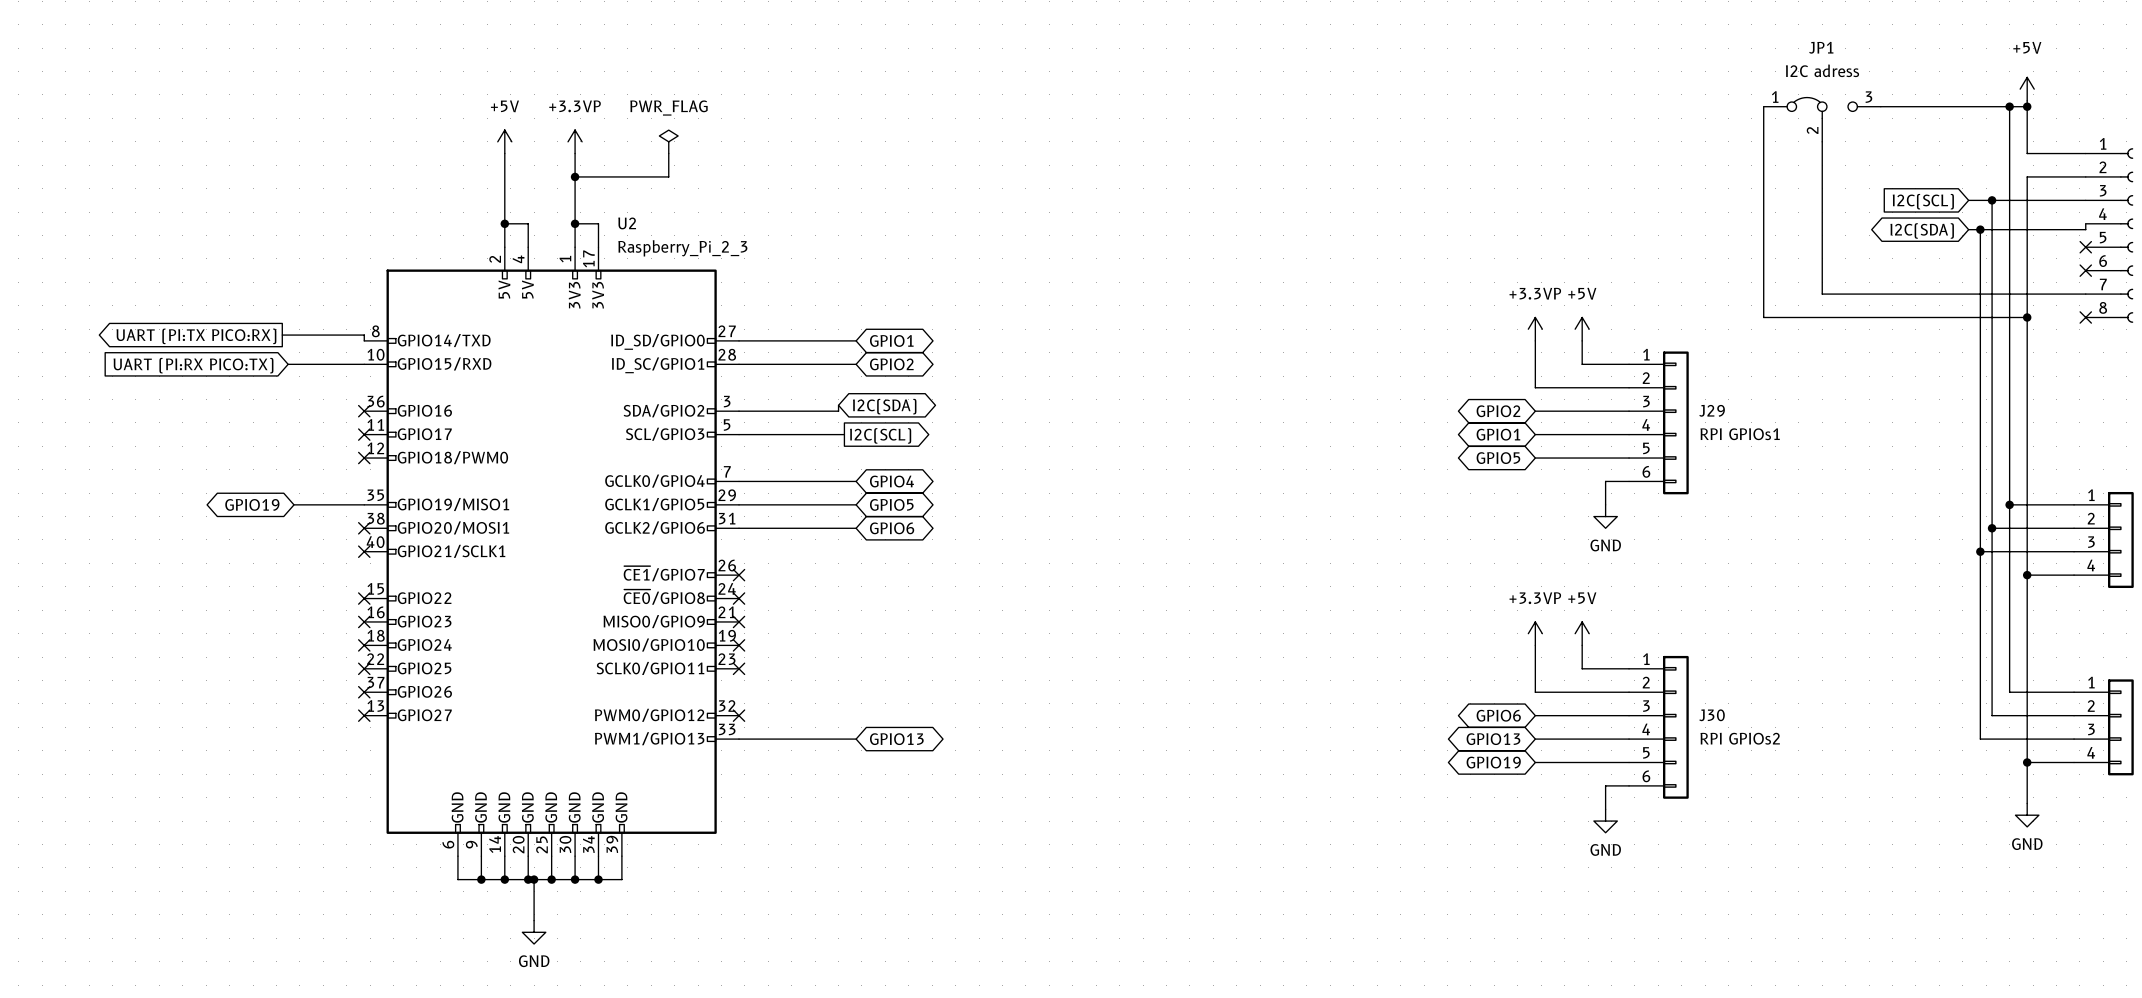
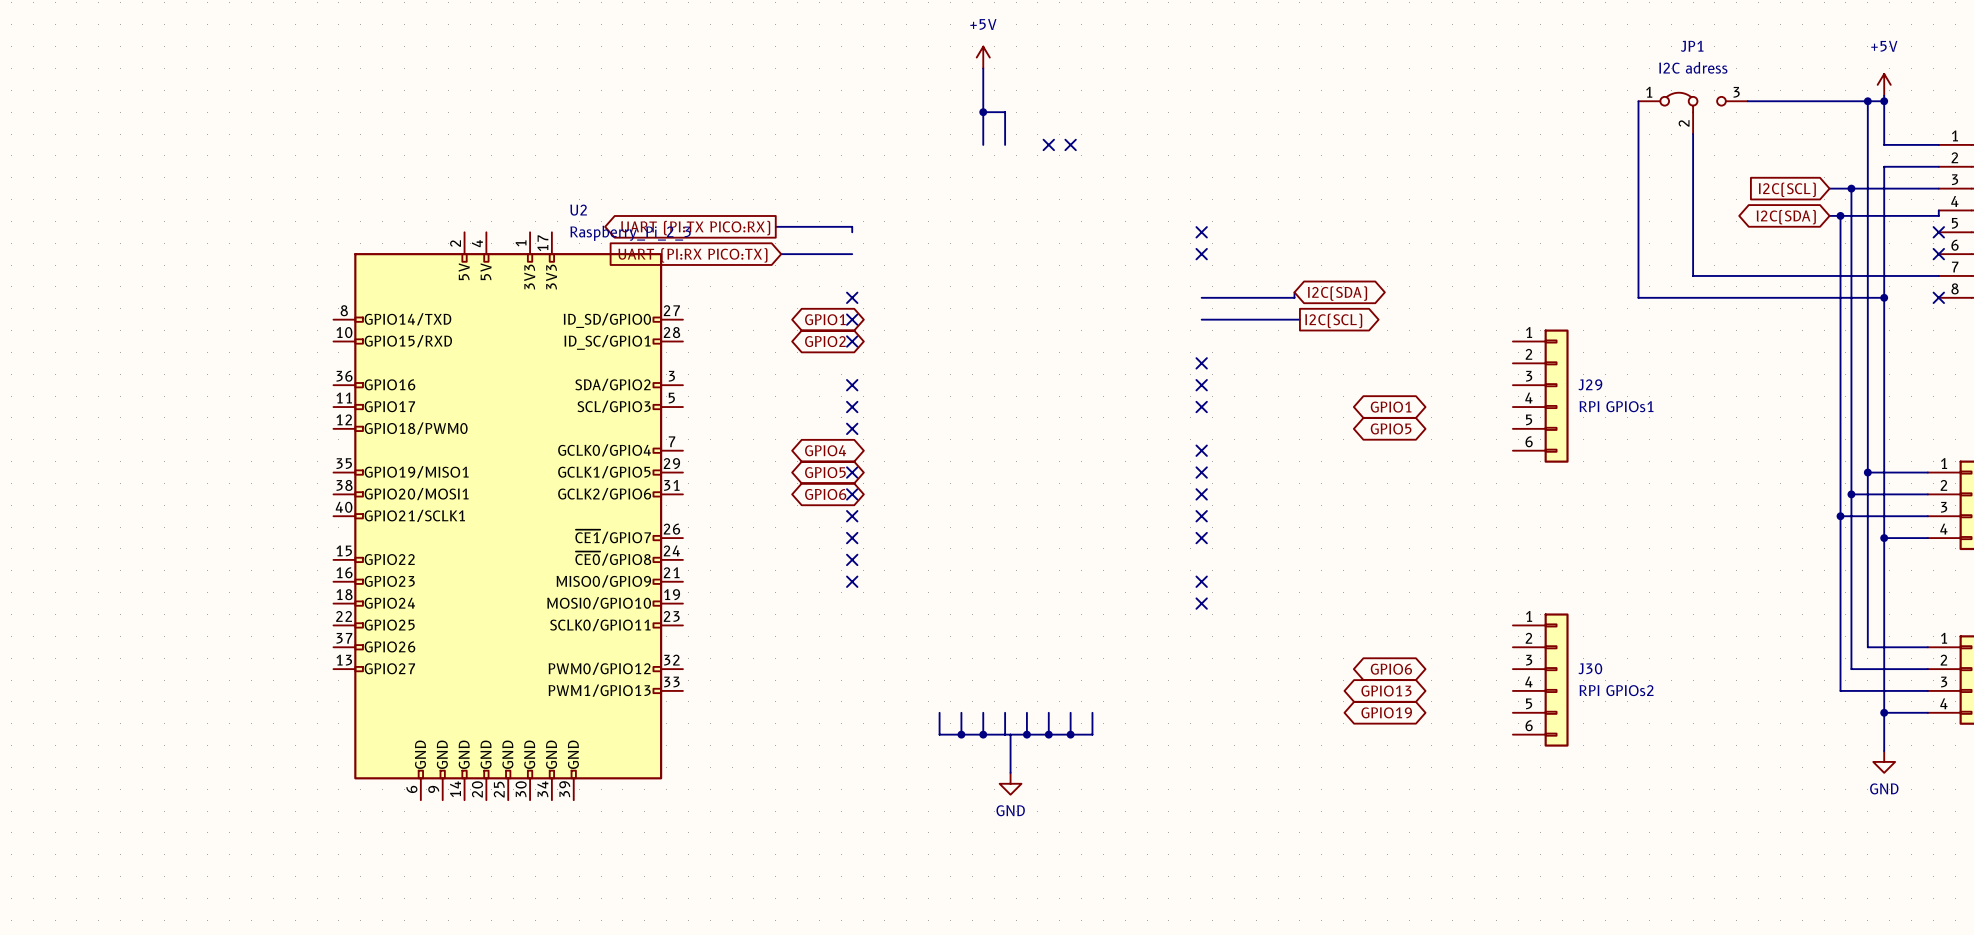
power symbol: none -> +5V (983, 57)
wire: none -> (983, 68) (983, 144)
wire: none -> (983, 112) (1005, 112) (1005, 144)
junction: none -> (983, 112)
power symbol: +5V (504, 141) -> none
power symbol: +3.3VP (575, 141) -> none
power symbol: PWR_FLAG (668, 141) -> none
wire: (504, 153) (504, 247) -> none
wire: (575, 153) (575, 247) -> none
wire: (668, 153) (668, 176) (575, 176) -> none
no-connect mark: none -> (1048, 144)
no-connect mark: none -> (1070, 144)
junction: (575, 176) -> none
wire: (504, 223) (528, 223) (528, 247) -> none
junction: (504, 223) -> none
wire: (575, 223) (598, 223) (598, 247) -> none
junction: (575, 223) -> none
wire: none -> (775, 226) (852, 226) (852, 232)
global label: none -> UART (PI:TX PICO:RX) (695, 228)
no-connect mark: none -> (1201, 232)
wire: none -> (781, 254) (852, 254)
no-connect mark: none -> (1201, 254)
global label: none -> UART (PI:RX PICO:TX) (692, 255)
wire: none -> (1294, 292) (1294, 297) (1201, 297)
global label: none -> I2C(SDA) (1337, 293)
no-connect mark: none -> (852, 297)
power symbol: +3.3VP (1535, 329) -> none
power symbol: +5V (1582, 329) -> none
wire: (282, 335) (364, 335) (364, 340) -> none
global label: UART (PI:TX PICO:RX) (196, 336) -> none
wire: (739, 340) (856, 340) -> none
no-connect mark: none -> (852, 319)
wire: none -> (1201, 319) (1299, 319)
wire: (1535, 340) (1535, 387) (1629, 387) -> none
wire: (1582, 340) (1582, 364) (1629, 364) -> none
global label: none -> I2C(SCL) (1333, 320)
wire: (288, 364) (364, 364) -> none
wire: (739, 364) (856, 364) -> none
no-connect mark: none -> (852, 341)
global label: UART (PI:RX PICO:TX) (193, 365) -> none
no-connect mark: none -> (1201, 363)
wire: (838, 405) (838, 411) (739, 411) -> none
global label: I2C(SDA) (884, 406) -> none
no-connect mark: (364, 411) -> none
no-connect mark: none -> (852, 385)
no-connect mark: none -> (1201, 385)
global label: GPIO2 (1498, 411) -> none
wire: (1535, 411) (1629, 411) -> none
no-connect mark: (364, 434) -> none
wire: (739, 434) (844, 434) -> none
no-connect mark: none -> (852, 407)
no-connect mark: none -> (1201, 407)
wire: (1535, 434) (1629, 434) -> none
global label: I2C(SCL) (880, 435) -> none
no-connect mark: (364, 458) -> none
no-connect mark: none -> (852, 428)
wire: (1535, 458) (1629, 458) -> none
wire: (739, 481) (856, 481) -> none
no-connect mark: none -> (1201, 450)
wire: (1629, 481) (1605, 481) (1605, 504) -> none
global label: GPIO19 (252, 504) -> none
wire: (294, 504) (364, 504) -> none
wire: (739, 504) (856, 504) -> none
no-connect mark: none -> (852, 472)
no-connect mark: none -> (1201, 472)
power symbol: GND (1605, 516) -> none
no-connect mark: (364, 528) -> none
wire: (739, 528) (856, 528) -> none
no-connect mark: none -> (852, 494)
no-connect mark: none -> (1201, 494)
no-connect mark: (364, 551) -> none
no-connect mark: none -> (852, 516)
no-connect mark: none -> (1201, 516)
no-connect mark: (739, 575) -> none
no-connect mark: none -> (852, 538)
no-connect mark: none -> (1201, 538)
no-connect mark: (364, 598) -> none
no-connect mark: (739, 598) -> none
no-connect mark: none -> (852, 559)
no-connect mark: (364, 621) -> none
no-connect mark: (739, 621) -> none
no-connect mark: none -> (852, 581)
no-connect mark: none -> (1201, 581)
power symbol: +3.3VP (1535, 633) -> none
power symbol: +5V (1582, 633) -> none
no-connect mark: (364, 645) -> none
no-connect mark: (739, 645) -> none
no-connect mark: none -> (1201, 603)
wire: (1535, 645) (1535, 692) (1629, 692) -> none
wire: (1582, 645) (1582, 668) (1629, 668) -> none
no-connect mark: (364, 668) -> none
no-connect mark: (739, 668) -> none
no-connect mark: (364, 692) -> none
no-connect mark: (364, 715) -> none
no-connect mark: (739, 715) -> none
wire: (1535, 715) (1629, 715) -> none
wire: (739, 739) (856, 739) -> none
global label: GPIO13 (896, 739) -> none
wire: (1535, 739) (1629, 739) -> none
wire: none -> (939, 712) (939, 734) (1092, 734) (1092, 712)
wire: none -> (961, 712) (961, 734)
wire: none -> (983, 712) (983, 734)
wire: none -> (1005, 712) (1005, 734)
wire: none -> (1026, 712) (1026, 734)
wire: none -> (1048, 712) (1048, 734)
wire: none -> (1070, 712) (1070, 734)
wire: (1535, 762) (1629, 762) -> none
junction: none -> (961, 734)
junction: none -> (983, 734)
wire: none -> (1010, 734) (1010, 772)
junction: none -> (1026, 734)
junction: none -> (1048, 734)
junction: none -> (1070, 734)
wire: (1629, 785) (1605, 785) (1605, 809) -> none
power symbol: GND (1605, 821) -> none
power symbol: none -> GND (1010, 783)
wire: (457, 856) (457, 879) (621, 879) (621, 856) -> none
wire: (481, 856) (481, 879) -> none
wire: (504, 856) (504, 879) -> none
wire: (528, 856) (528, 879) -> none
wire: (551, 856) (551, 879) -> none
wire: (575, 856) (575, 879) -> none
wire: (598, 856) (598, 879) -> none
junction: (481, 879) -> none
junction: (504, 879) -> none
junction: (528, 879) -> none
wire: (534, 879) (534, 920) -> none
junction: (534, 879) -> none
junction: (551, 879) -> none
junction: (575, 879) -> none
junction: (598, 879) -> none
power symbol: GND (534, 932) -> none

